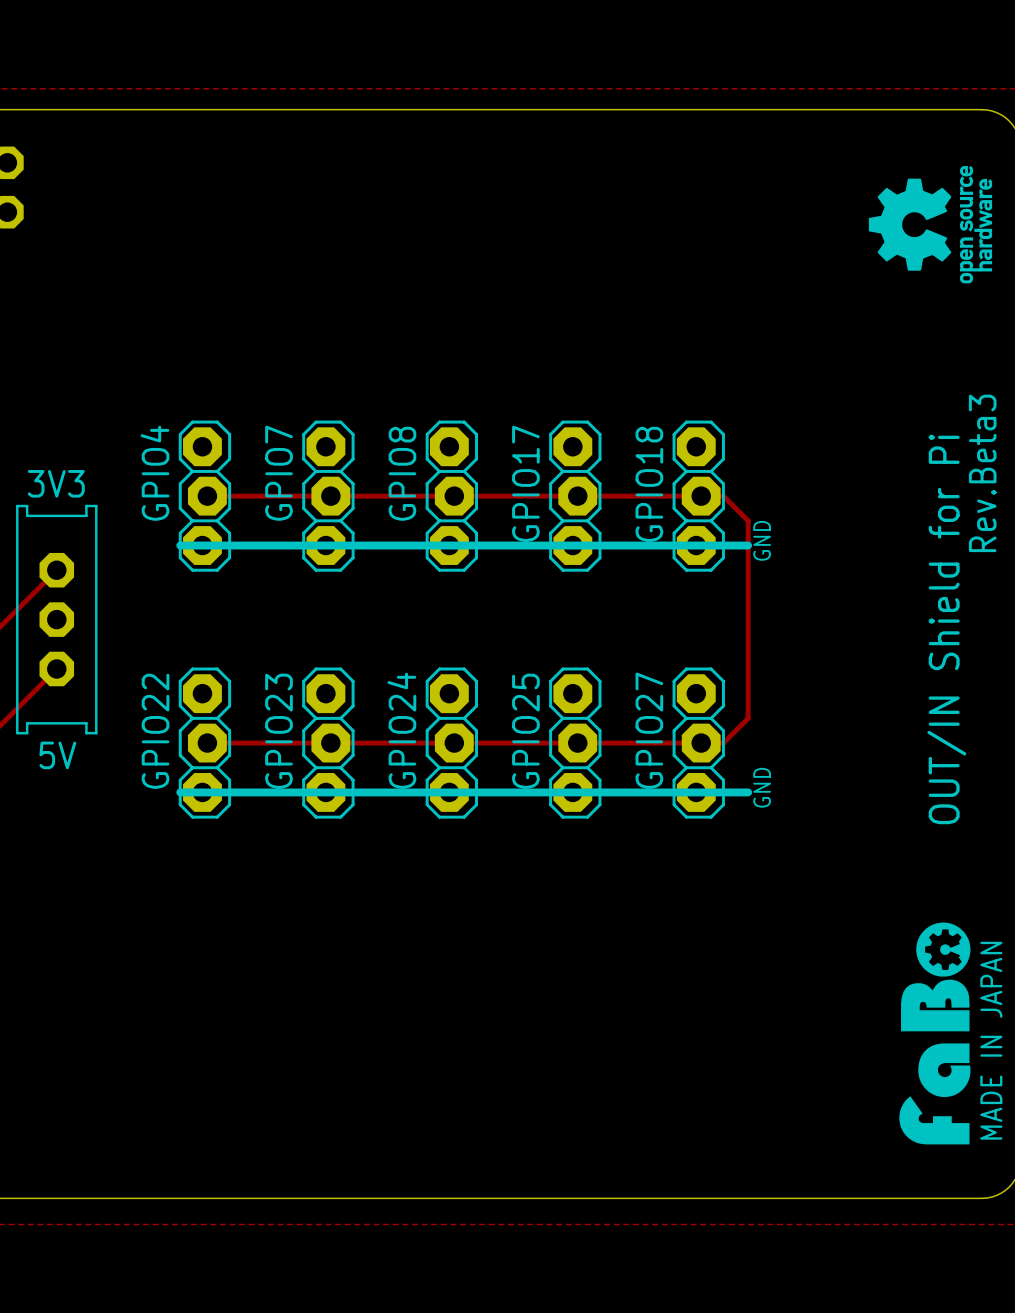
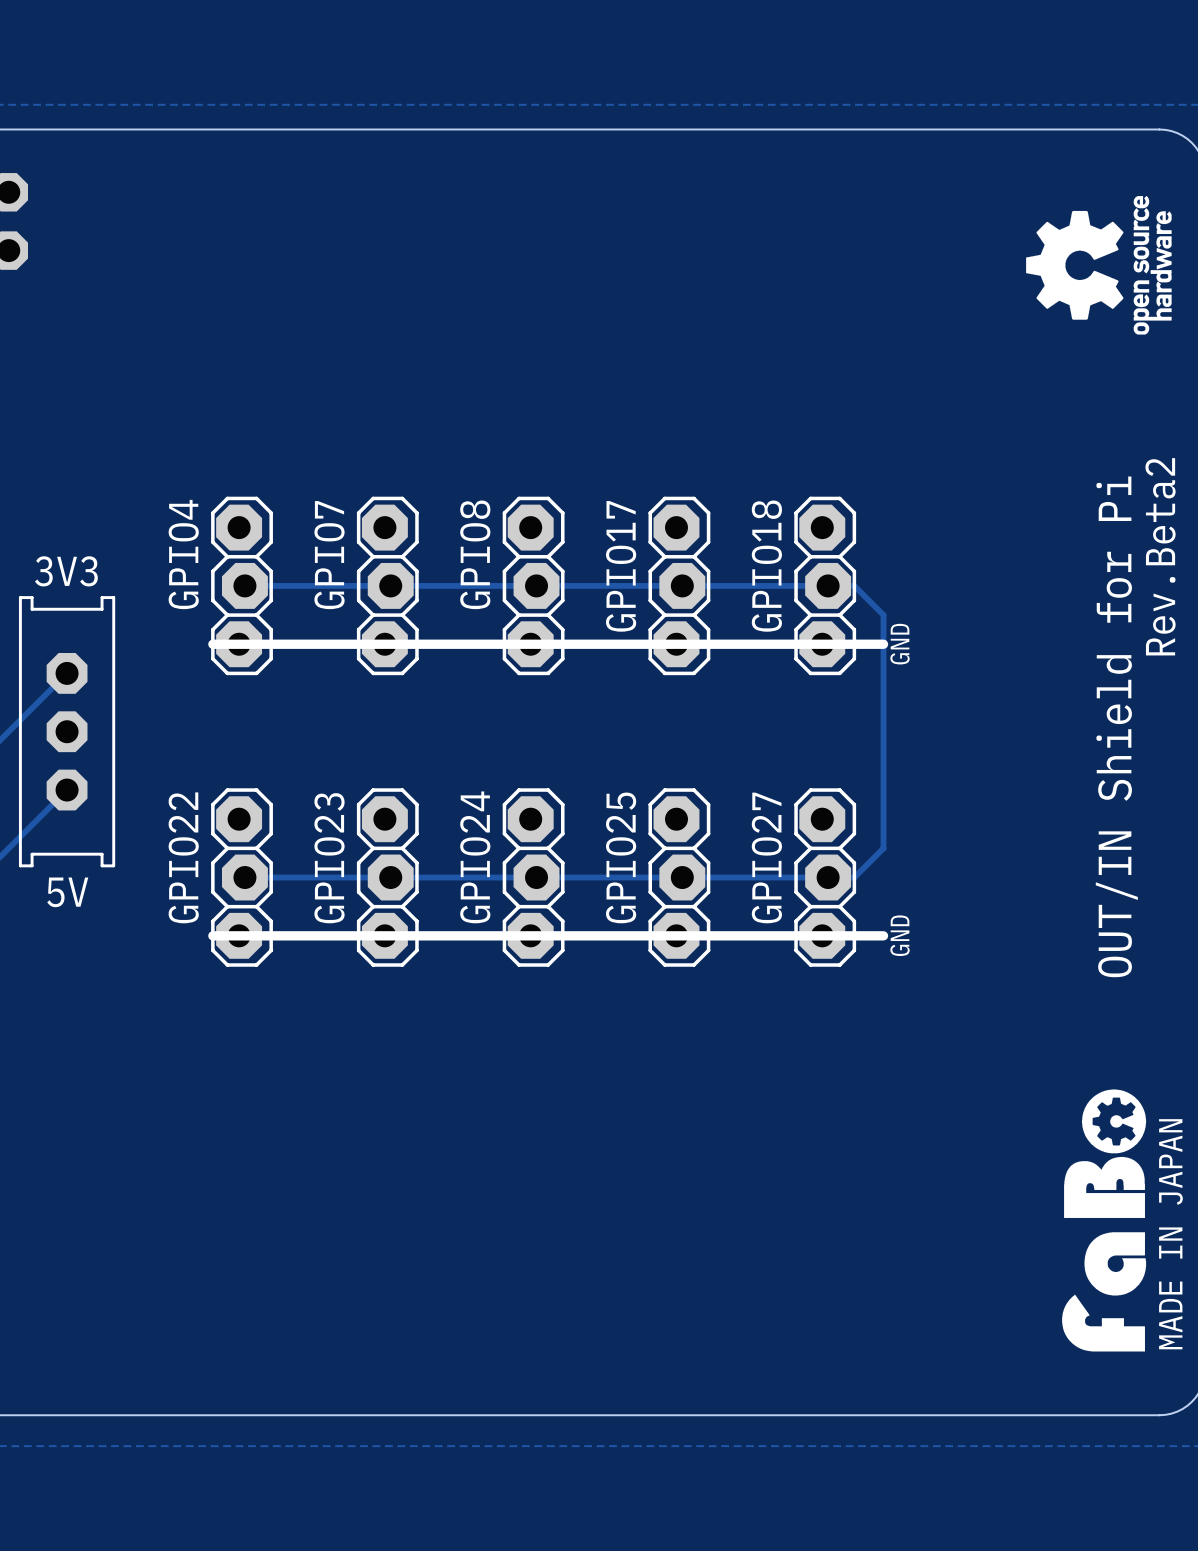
text: Rev.Beta3 (982, 473) -> Rev.Beta2 (1160, 556)

